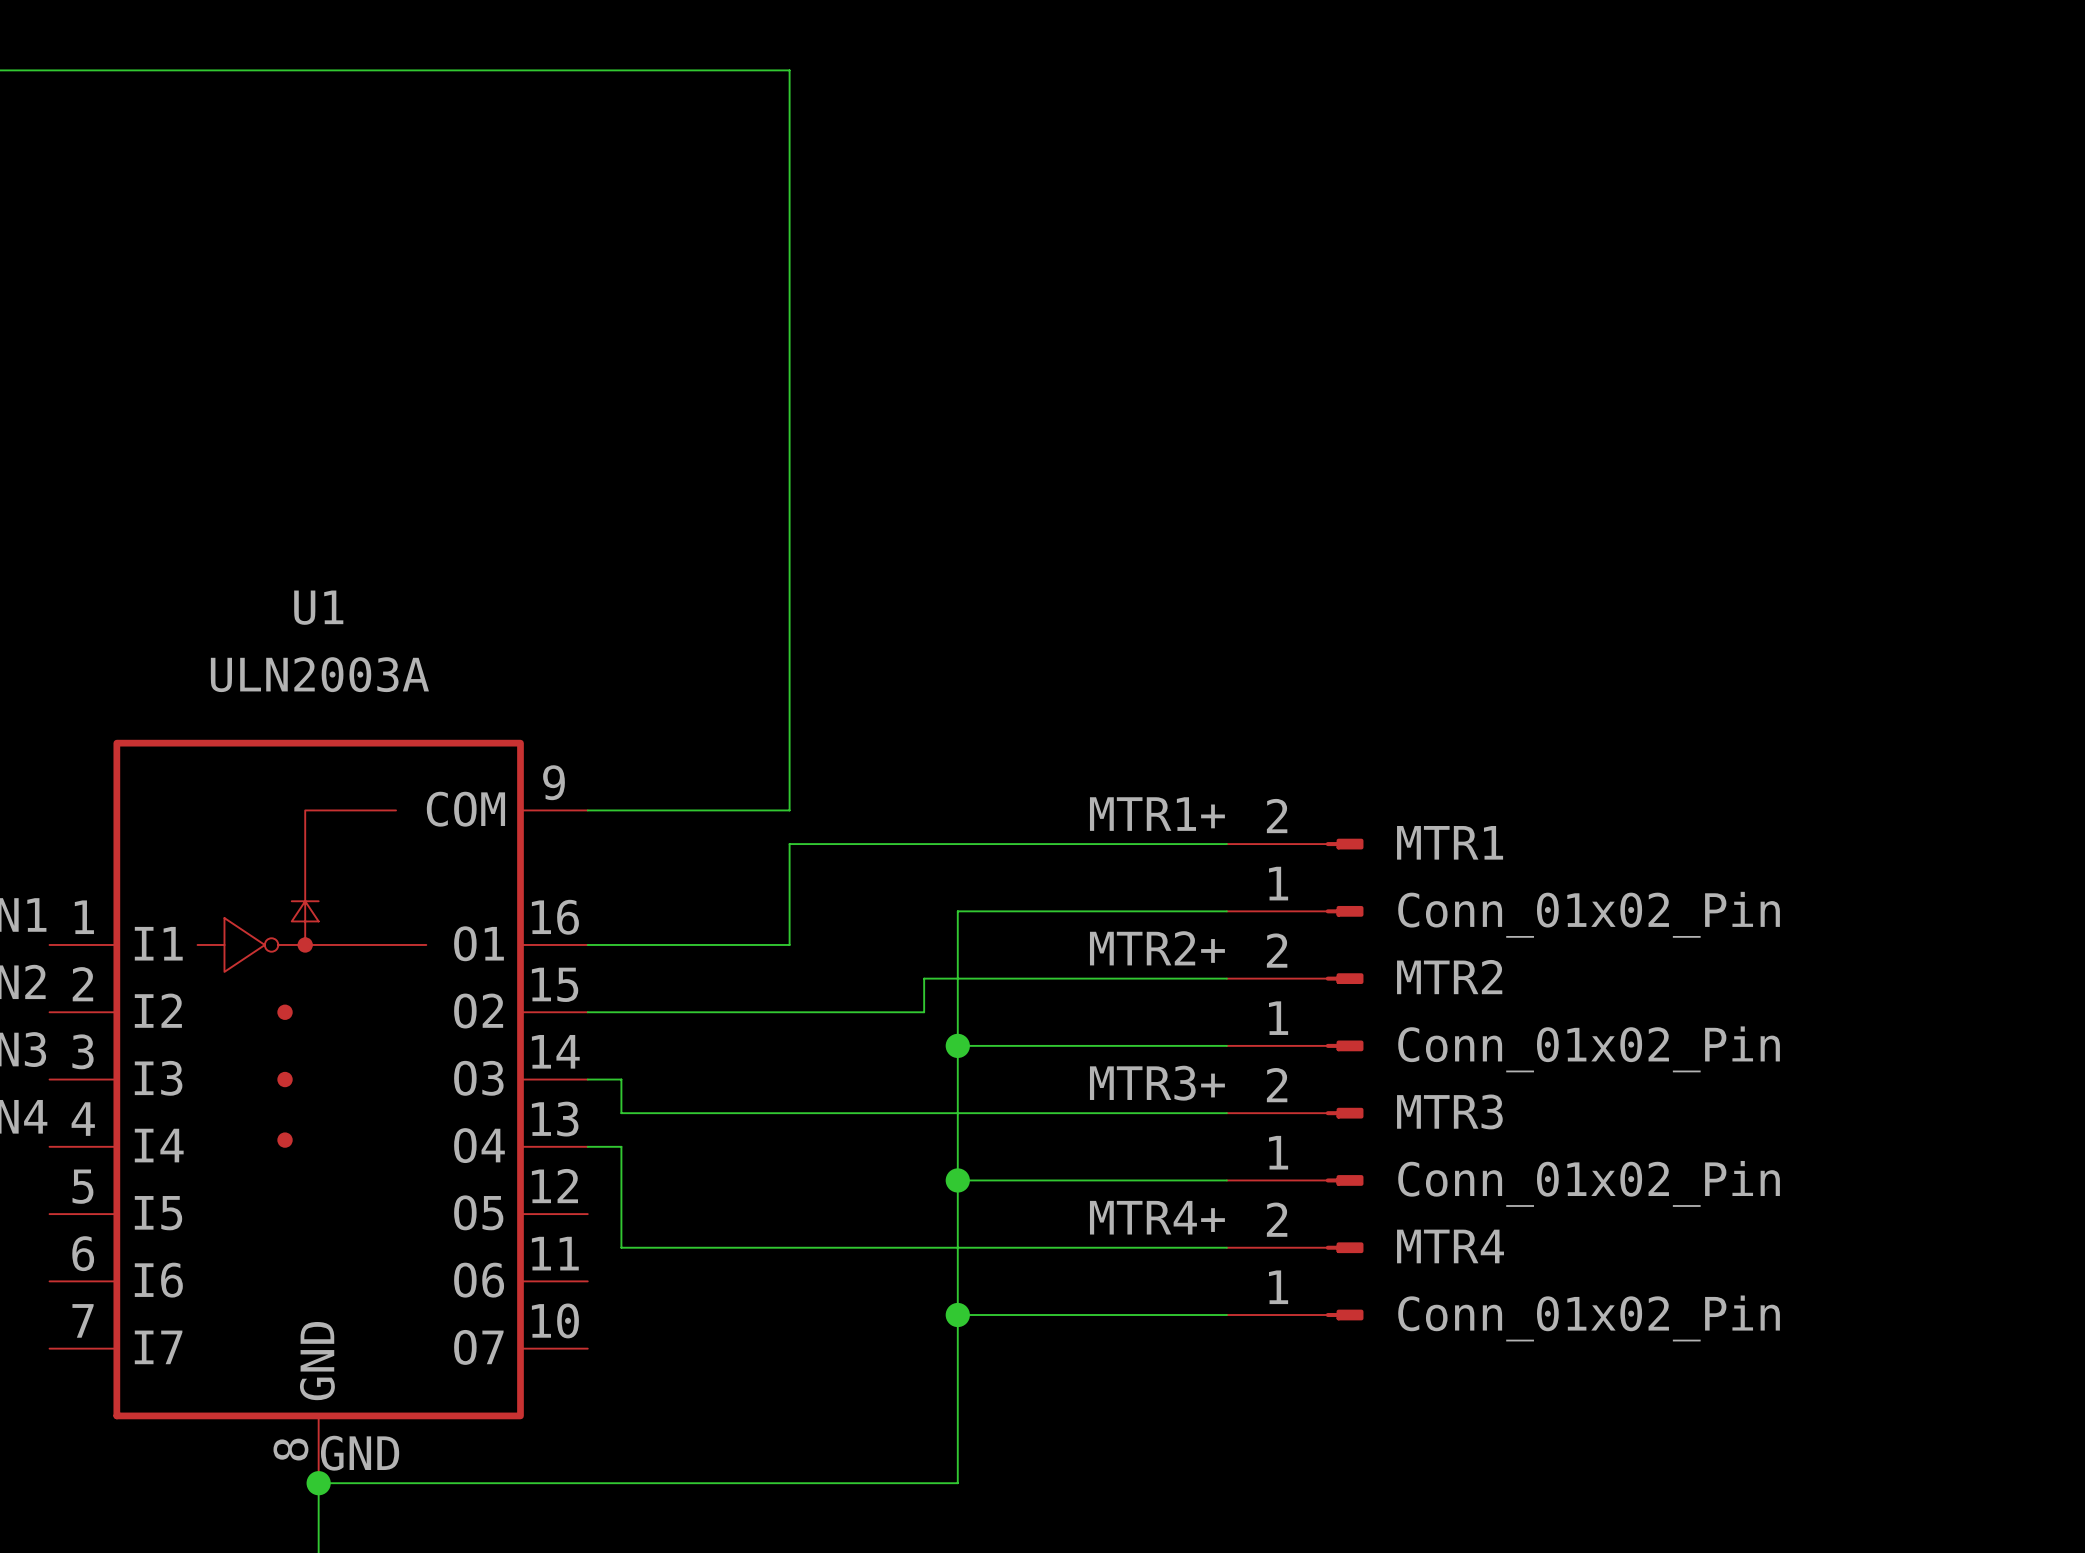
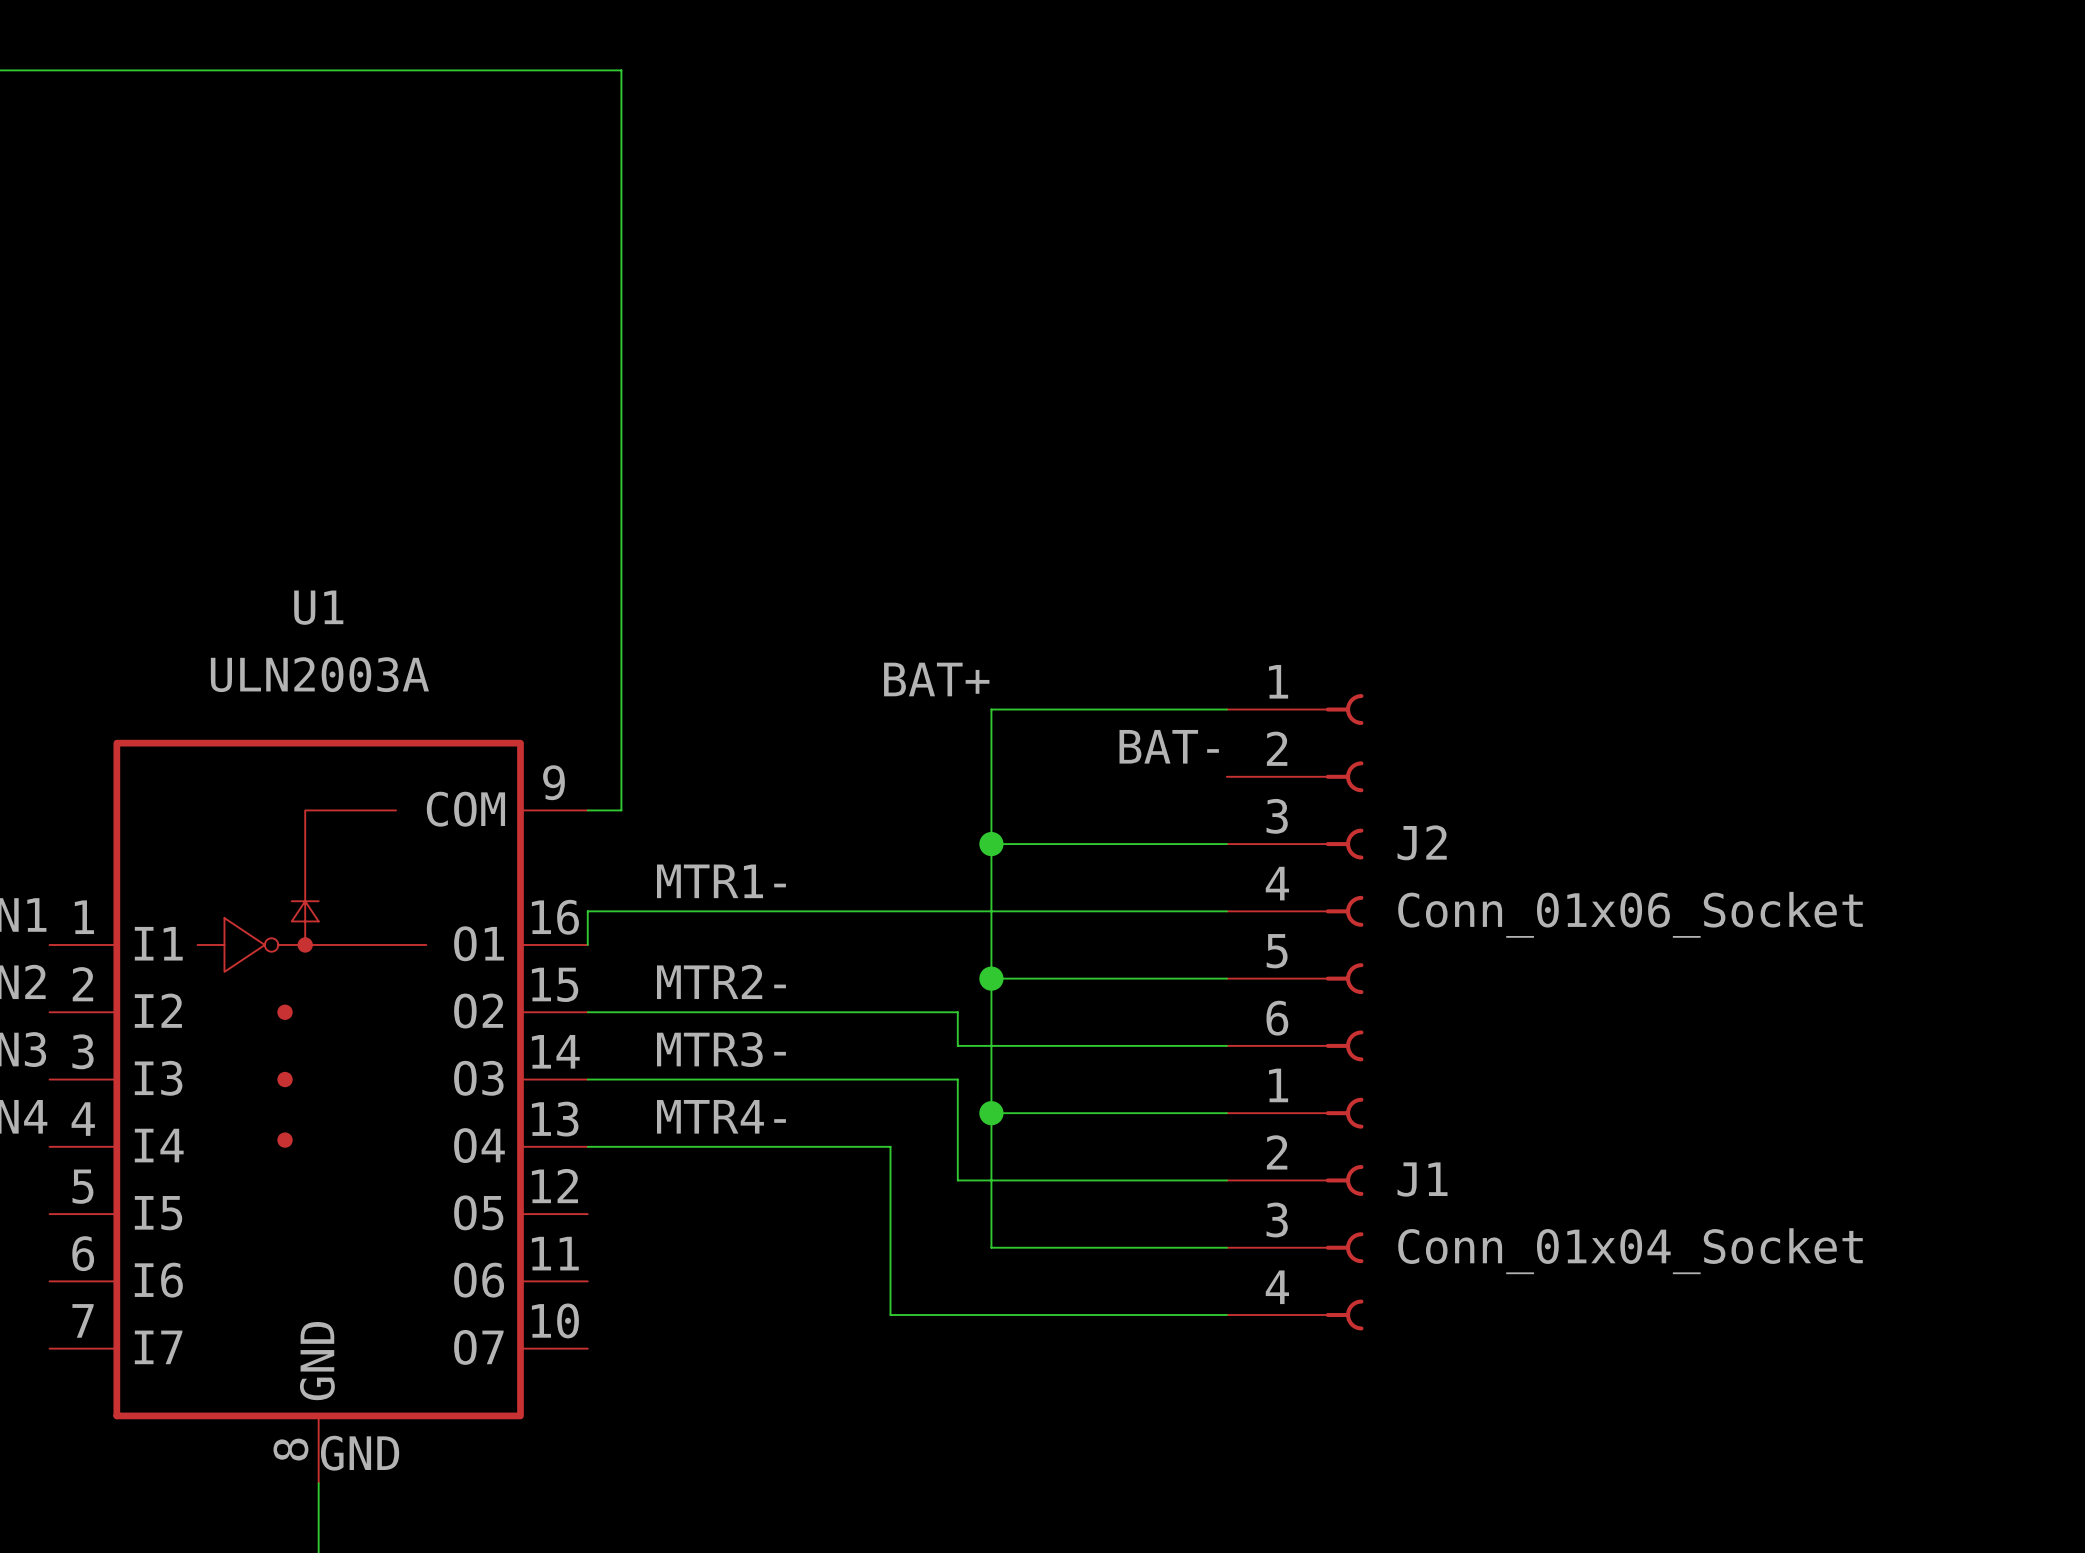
wire: (621, 70) (789, 70) (789, 810) (621, 810) -> (621, 70) (621, 810)
label: none -> BAT+ (936, 679)
wire: none -> (1226, 709) (991, 709) (991, 1247)
label: none -> BAT- (1169, 746)
label: MTR1+ (1157, 814) -> none
wire: (991, 844) (789, 844) (789, 944) (587, 944) -> (957, 911) (587, 911) (587, 944)
junction: none -> (991, 844)
MTR1: Conn_01x02_Pin (1295, 877) -> none
J2: none -> Conn_01x06_Socket (1295, 877)
label: none -> MTR1- (721, 881)
wire: (957, 911) (957, 1012) -> none
label: MTR2+ (1157, 948) -> none
wire: (991, 978) (924, 978) (924, 1012) -> (957, 1012) (924, 1012)
junction: none -> (991, 978)
label: none -> MTR2- (721, 981)
MTR2: Conn_01x02_Pin (1295, 1012) -> none
wire: (957, 1045) (957, 1079) -> none
junction: (957, 1045) -> none
label: none -> MTR3- (721, 1049)
wire: (621, 1079) (621, 1113) (991, 1113) -> (621, 1079) (957, 1079)
label: MTR3+ (1157, 1083) -> none
junction: none -> (991, 1113)
label: none -> MTR4- (721, 1116)
wire: (621, 1146) (621, 1247) (991, 1247) -> (621, 1146) (890, 1146) (890, 1315) (957, 1315)
MTR3: Conn_01x02_Pin (1295, 1146) -> none
wire: (957, 1180) (957, 1483) (318, 1483) -> none
junction: (957, 1180) -> none
J1: none -> Conn_01x04_Socket (1295, 1214)
label: MTR4+ (1157, 1217) -> none
MTR4: Conn_01x02_Pin (1295, 1281) -> none
junction: (957, 1315) -> none
junction: (318, 1483) -> none

